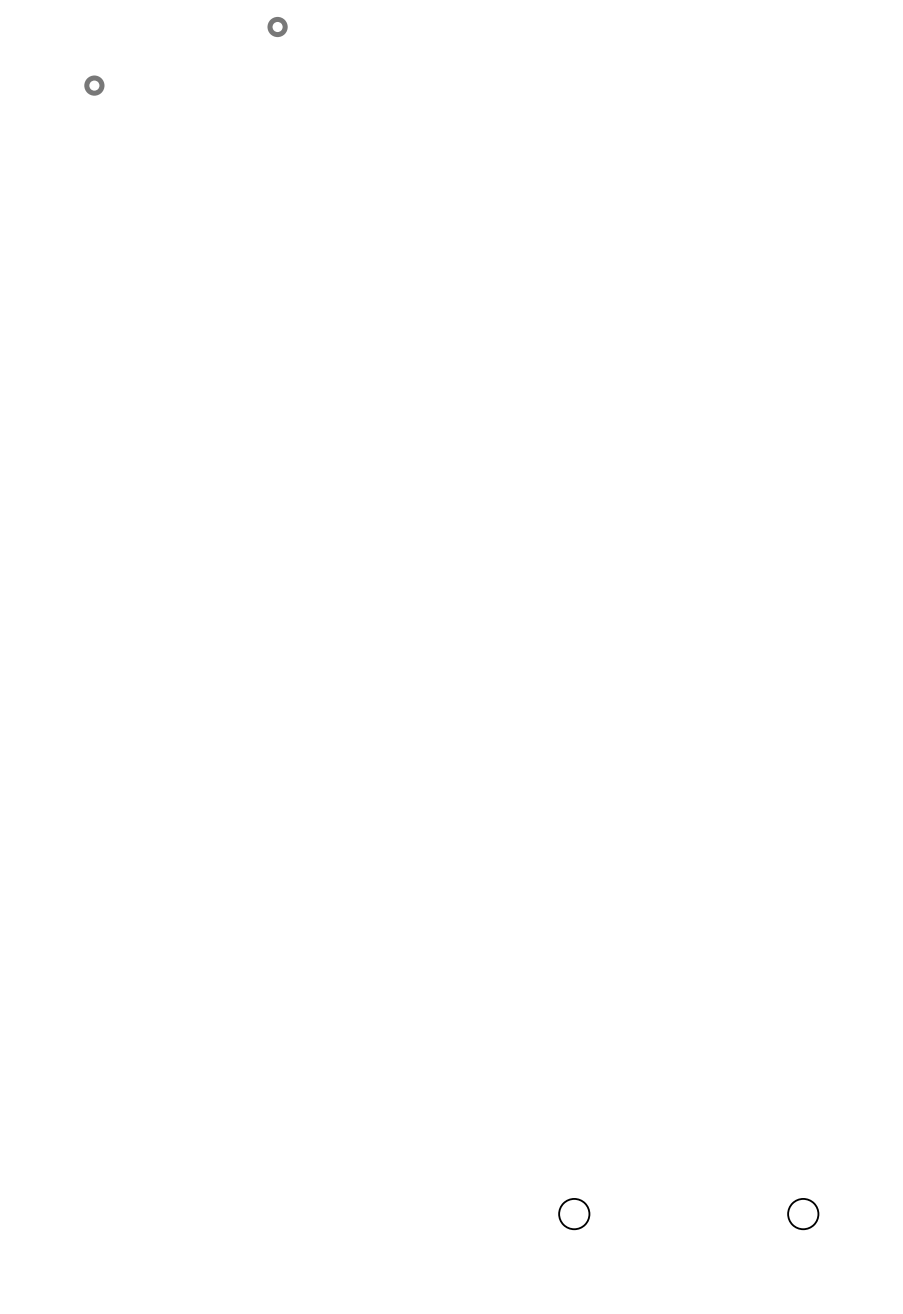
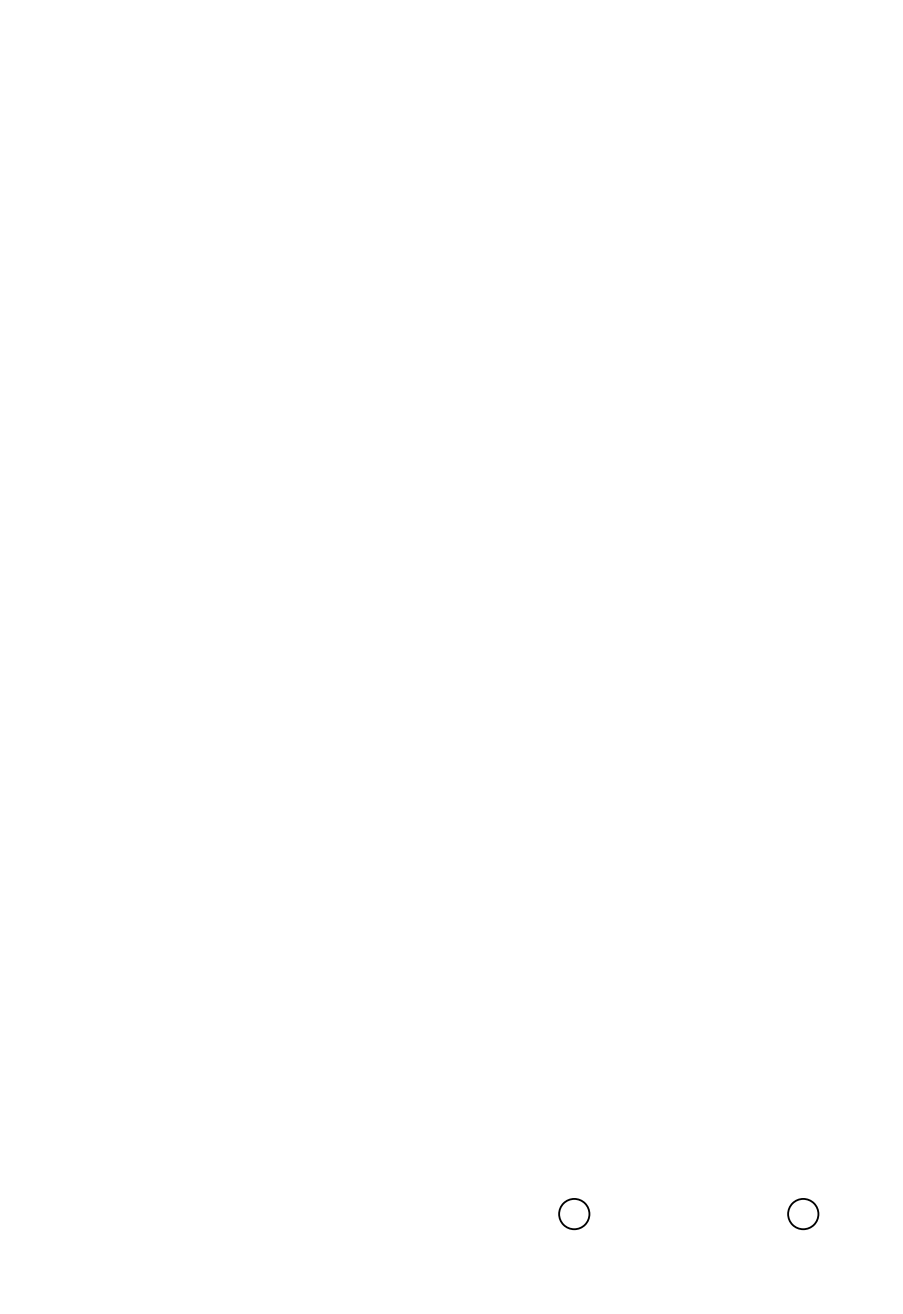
via: (277, 27) -> none
via: (94, 85) -> none

